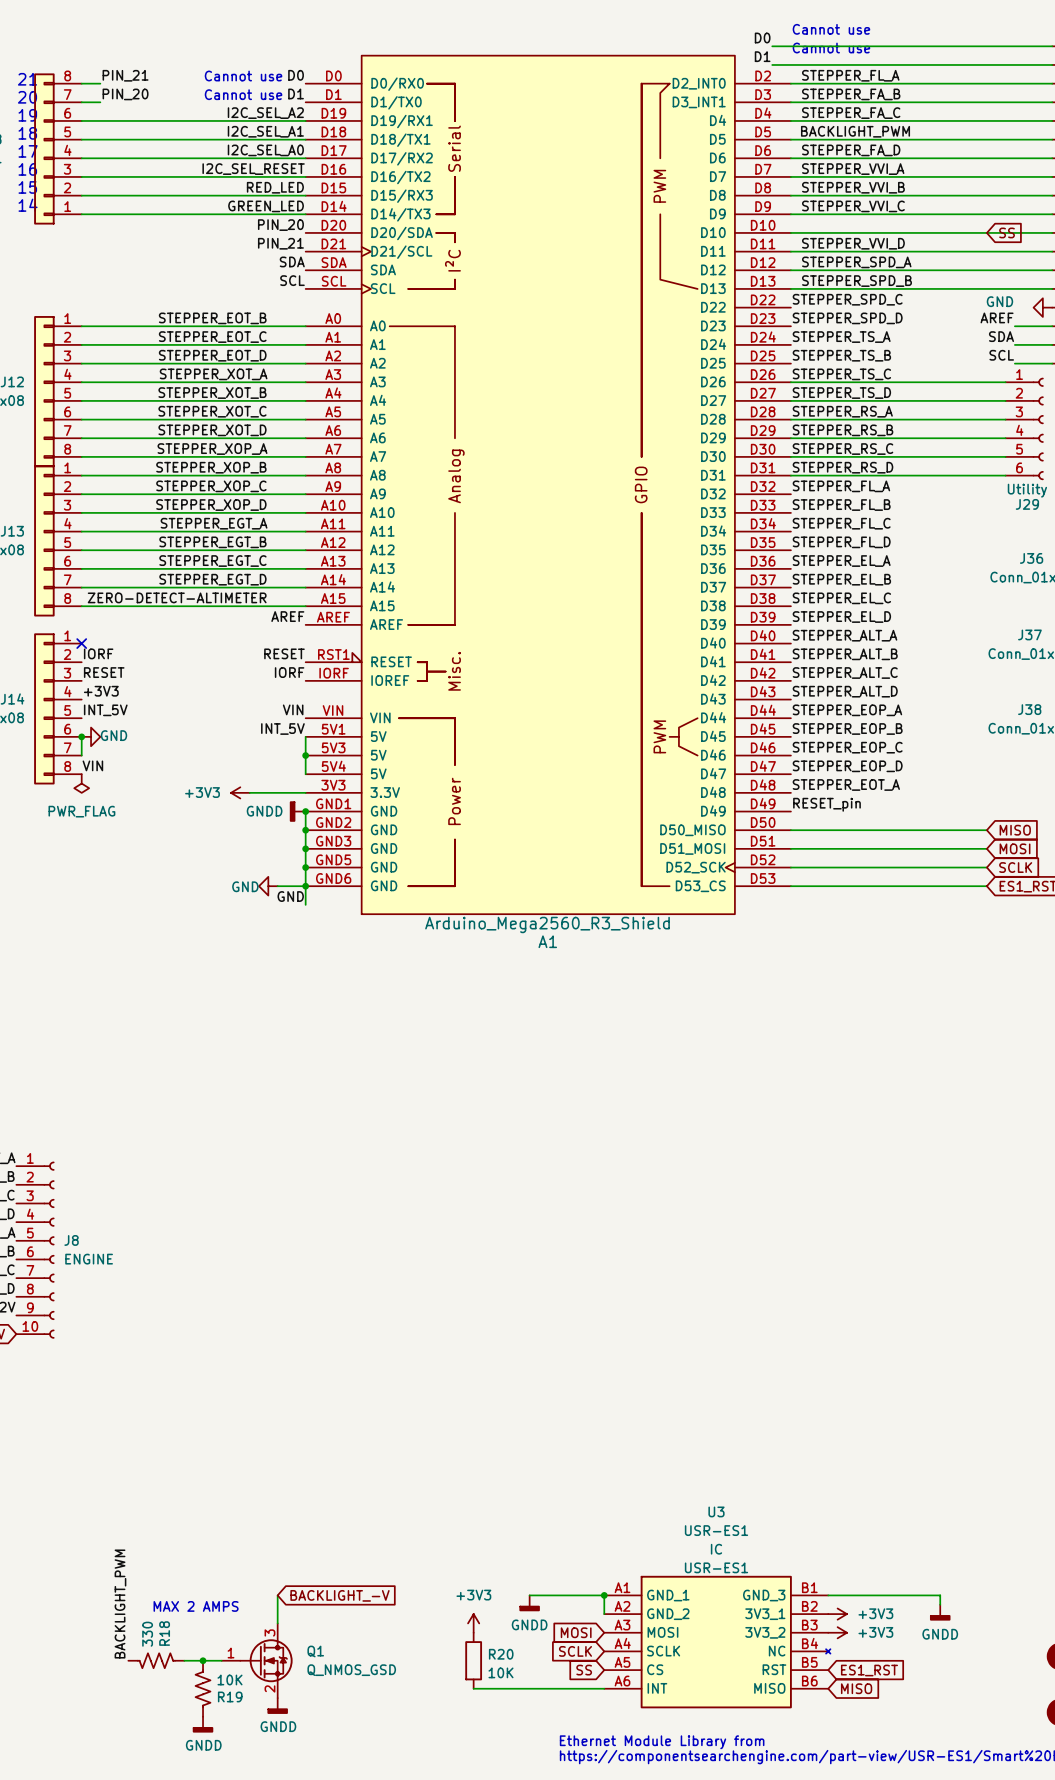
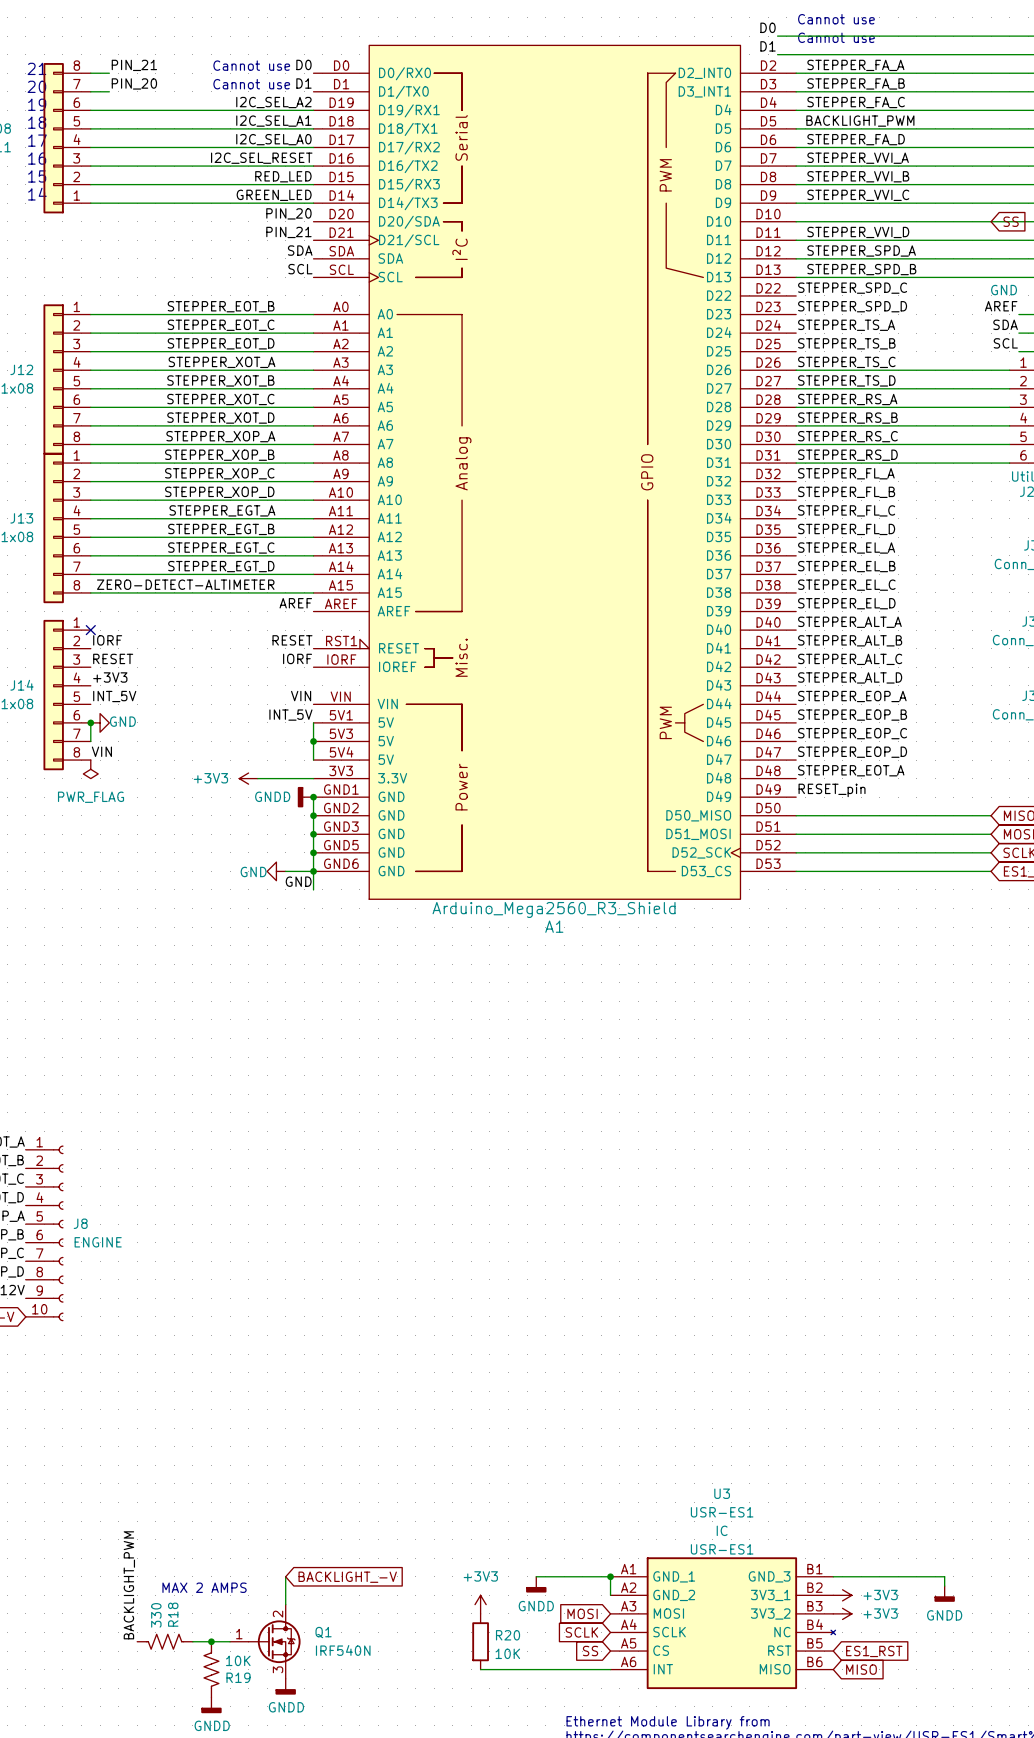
label: STEPPER_FL_A (850, 75) -> STEPPER_FA_A (855, 65)
Q1 pin number: 3 (269, 1632) -> 2 (278, 1614)
Q1 value: Q_NMOS_GSD (351, 1670) -> IRF540N (343, 1650)
Q1 pin number: 2 (269, 1688) -> 3 (278, 1669)

